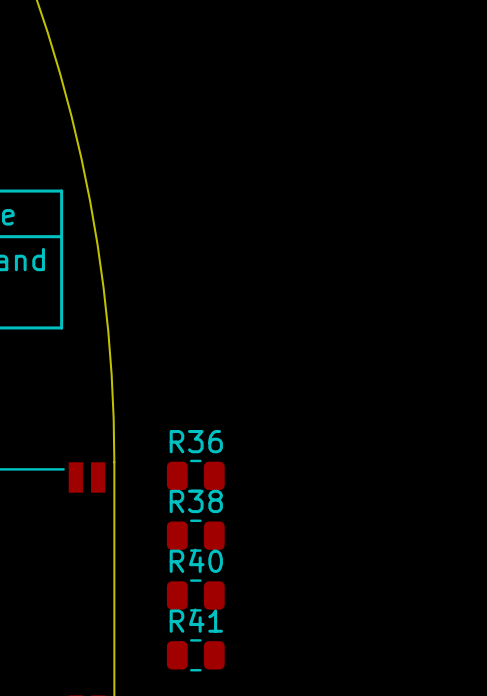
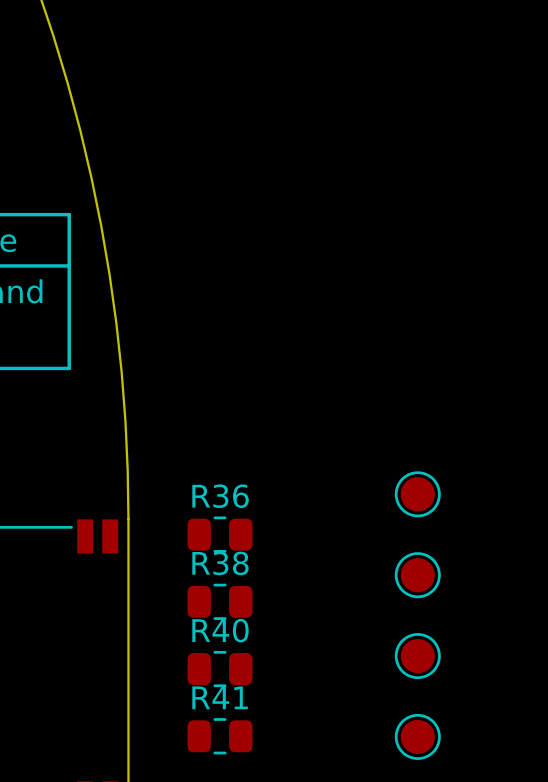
part: none -> (417, 494)
part: none -> (417, 575)
part: none -> (417, 656)
part: none -> (417, 736)

